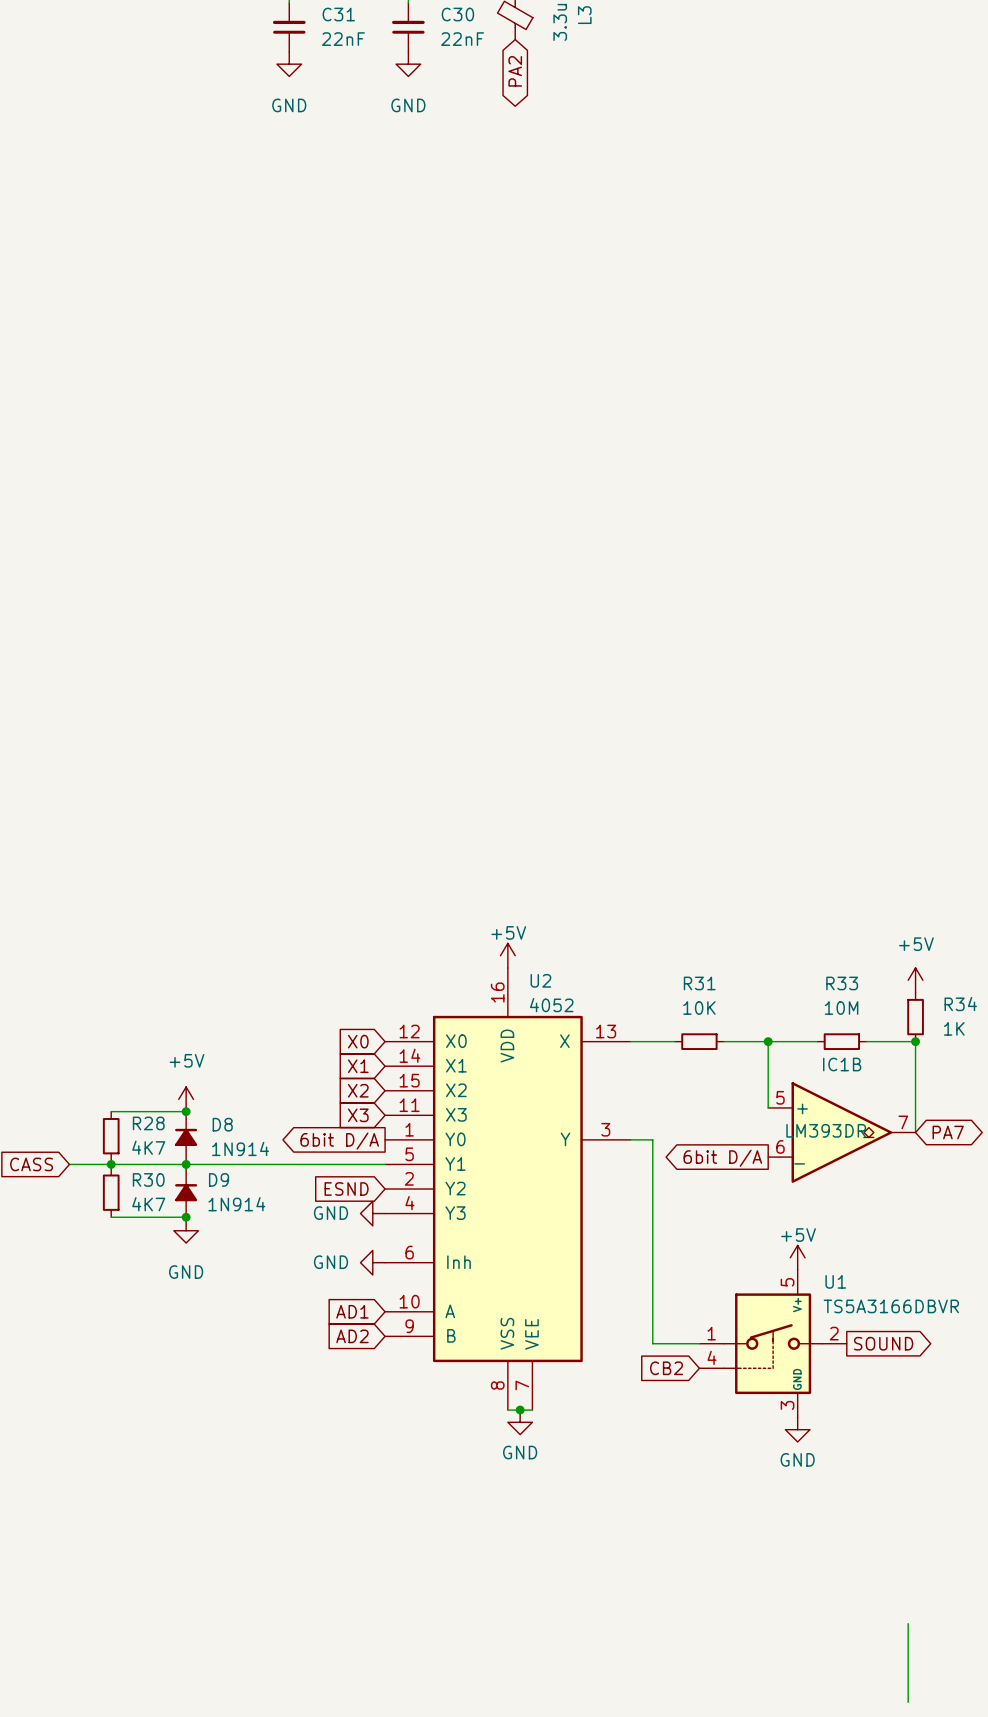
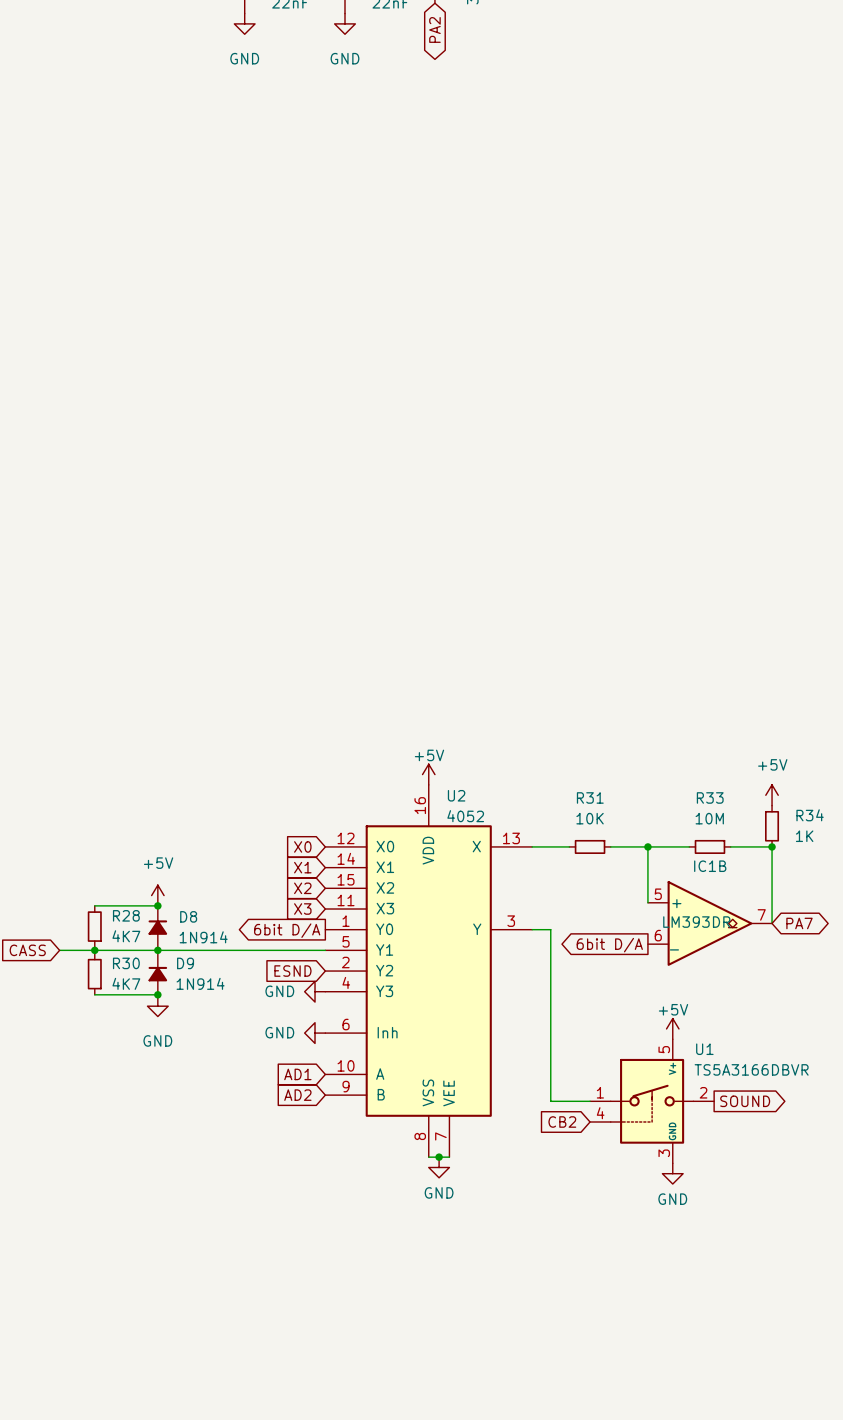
wire: (908, 1623) (908, 1702) -> none

